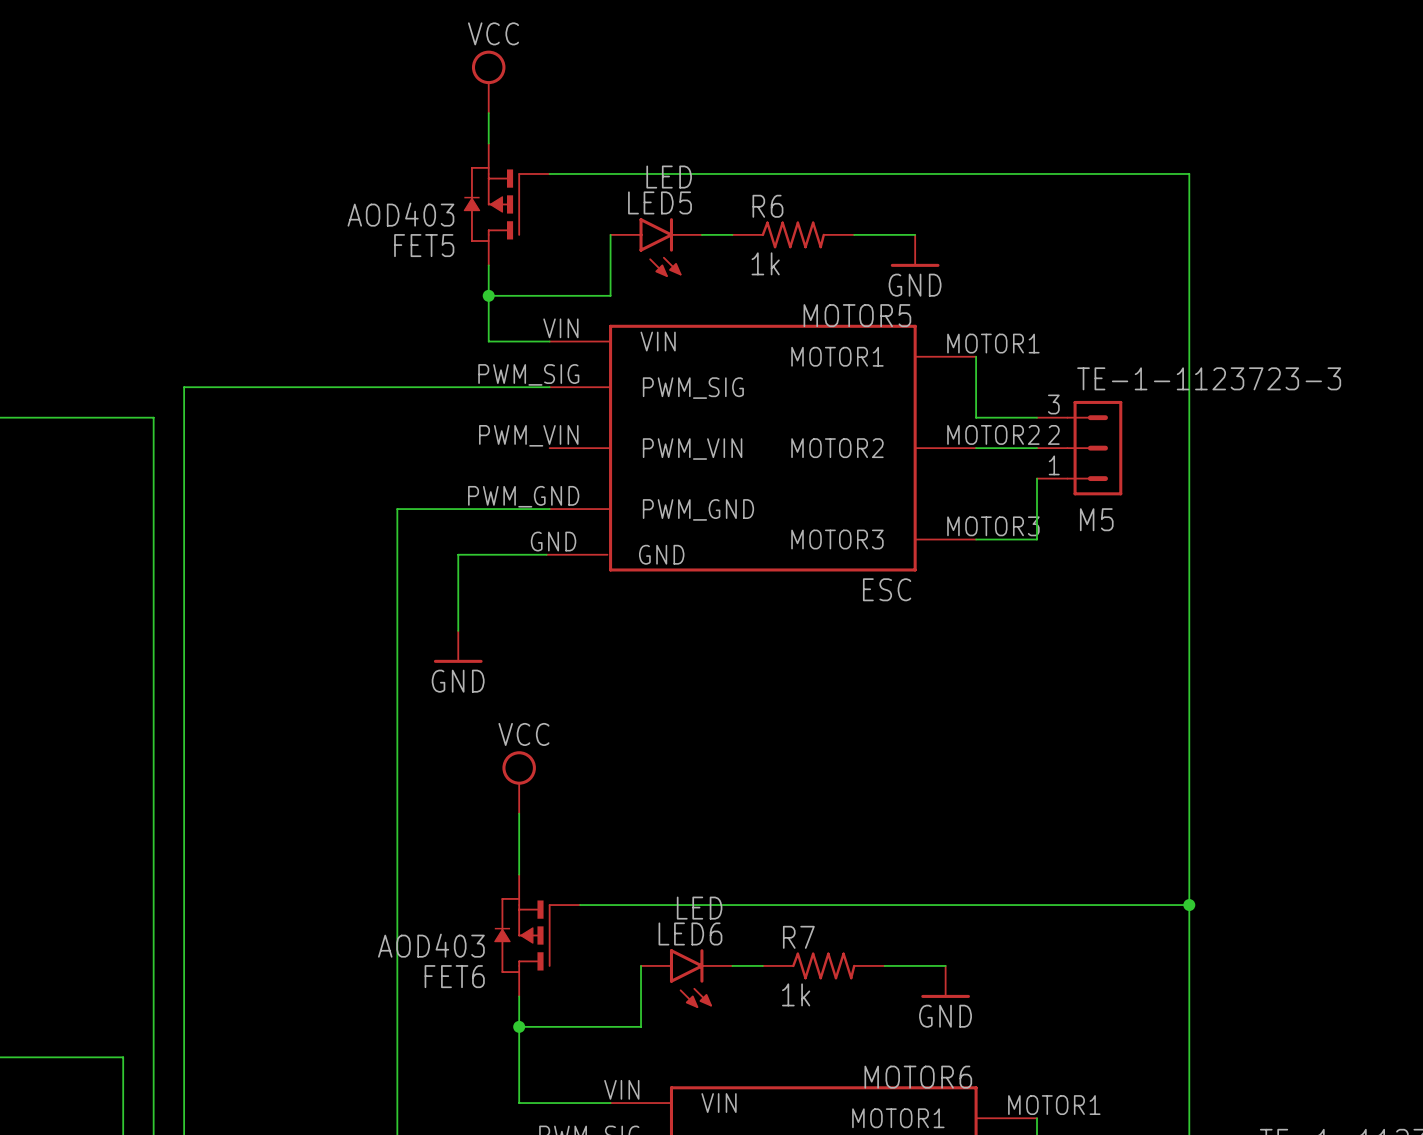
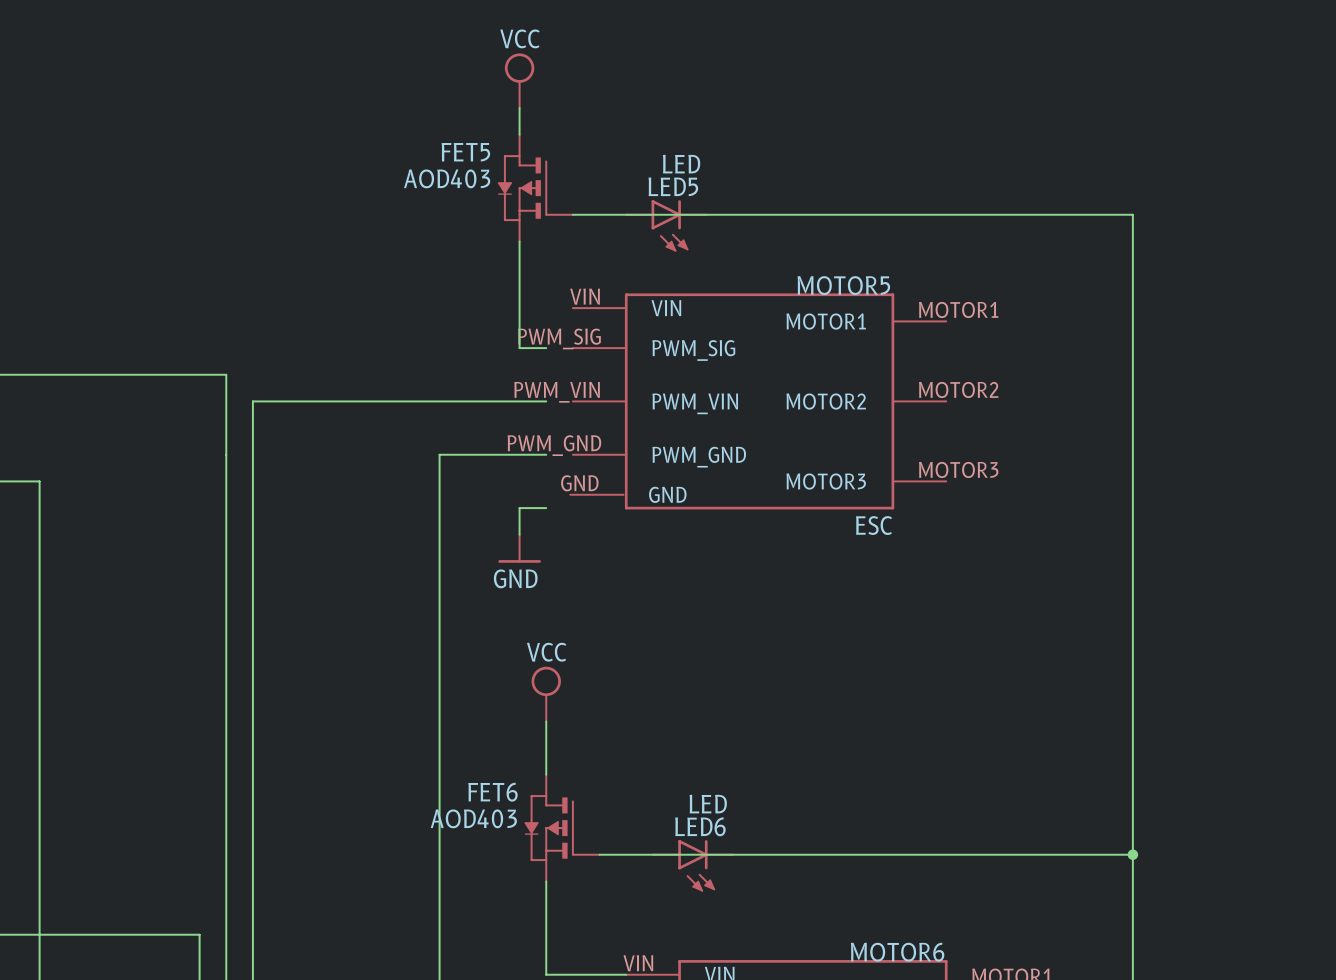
wire: (549, 173) (1189, 173) (1189, 234) -> (892, 214) (1132, 214)
FET5 flip: as is (491, 204) -> up-down (522, 188)
wire: none -> (572, 214) (706, 214)
wire: (610, 234) (610, 295) (488, 295) -> none
R6: 1k (793, 234) -> none
power symbol: GND (915, 250) -> none
junction: (488, 295) -> none
wire: (488, 341) (549, 341) -> (519, 308) (519, 348)
wire: (976, 356) (976, 417) (1037, 417) -> none
wire: (488, 387) (184, 387) (184, 448) -> (546, 401) (252, 401)
wire: (519, 387) (549, 387) -> none
wire: (976, 448) (1037, 448) -> none
M5: TE-1-1123723-3 (1079, 448) -> none
wire: (1037, 478) (1037, 539) (976, 539) -> none
wire: (519, 509) (549, 509) -> none
wire: (546, 554) (458, 554) (458, 630) -> none
wire: none -> (546, 508) (519, 508) (519, 534)
power symbol position: GND (458, 646) -> GND (519, 548)
wire: (580, 905) (1189, 905) -> none
junction position: (1189, 905) -> (1132, 854)
FET6 flip: as is (522, 935) -> up-down (549, 828)
wire: none -> (599, 854) (732, 854)
wire: (641, 965) (641, 1026) (519, 1026) -> none
R7: 1k (823, 965) -> none
wire: none -> (919, 854) (1132, 854)
power symbol: GND (945, 981) -> none
junction: (519, 1026) -> none

